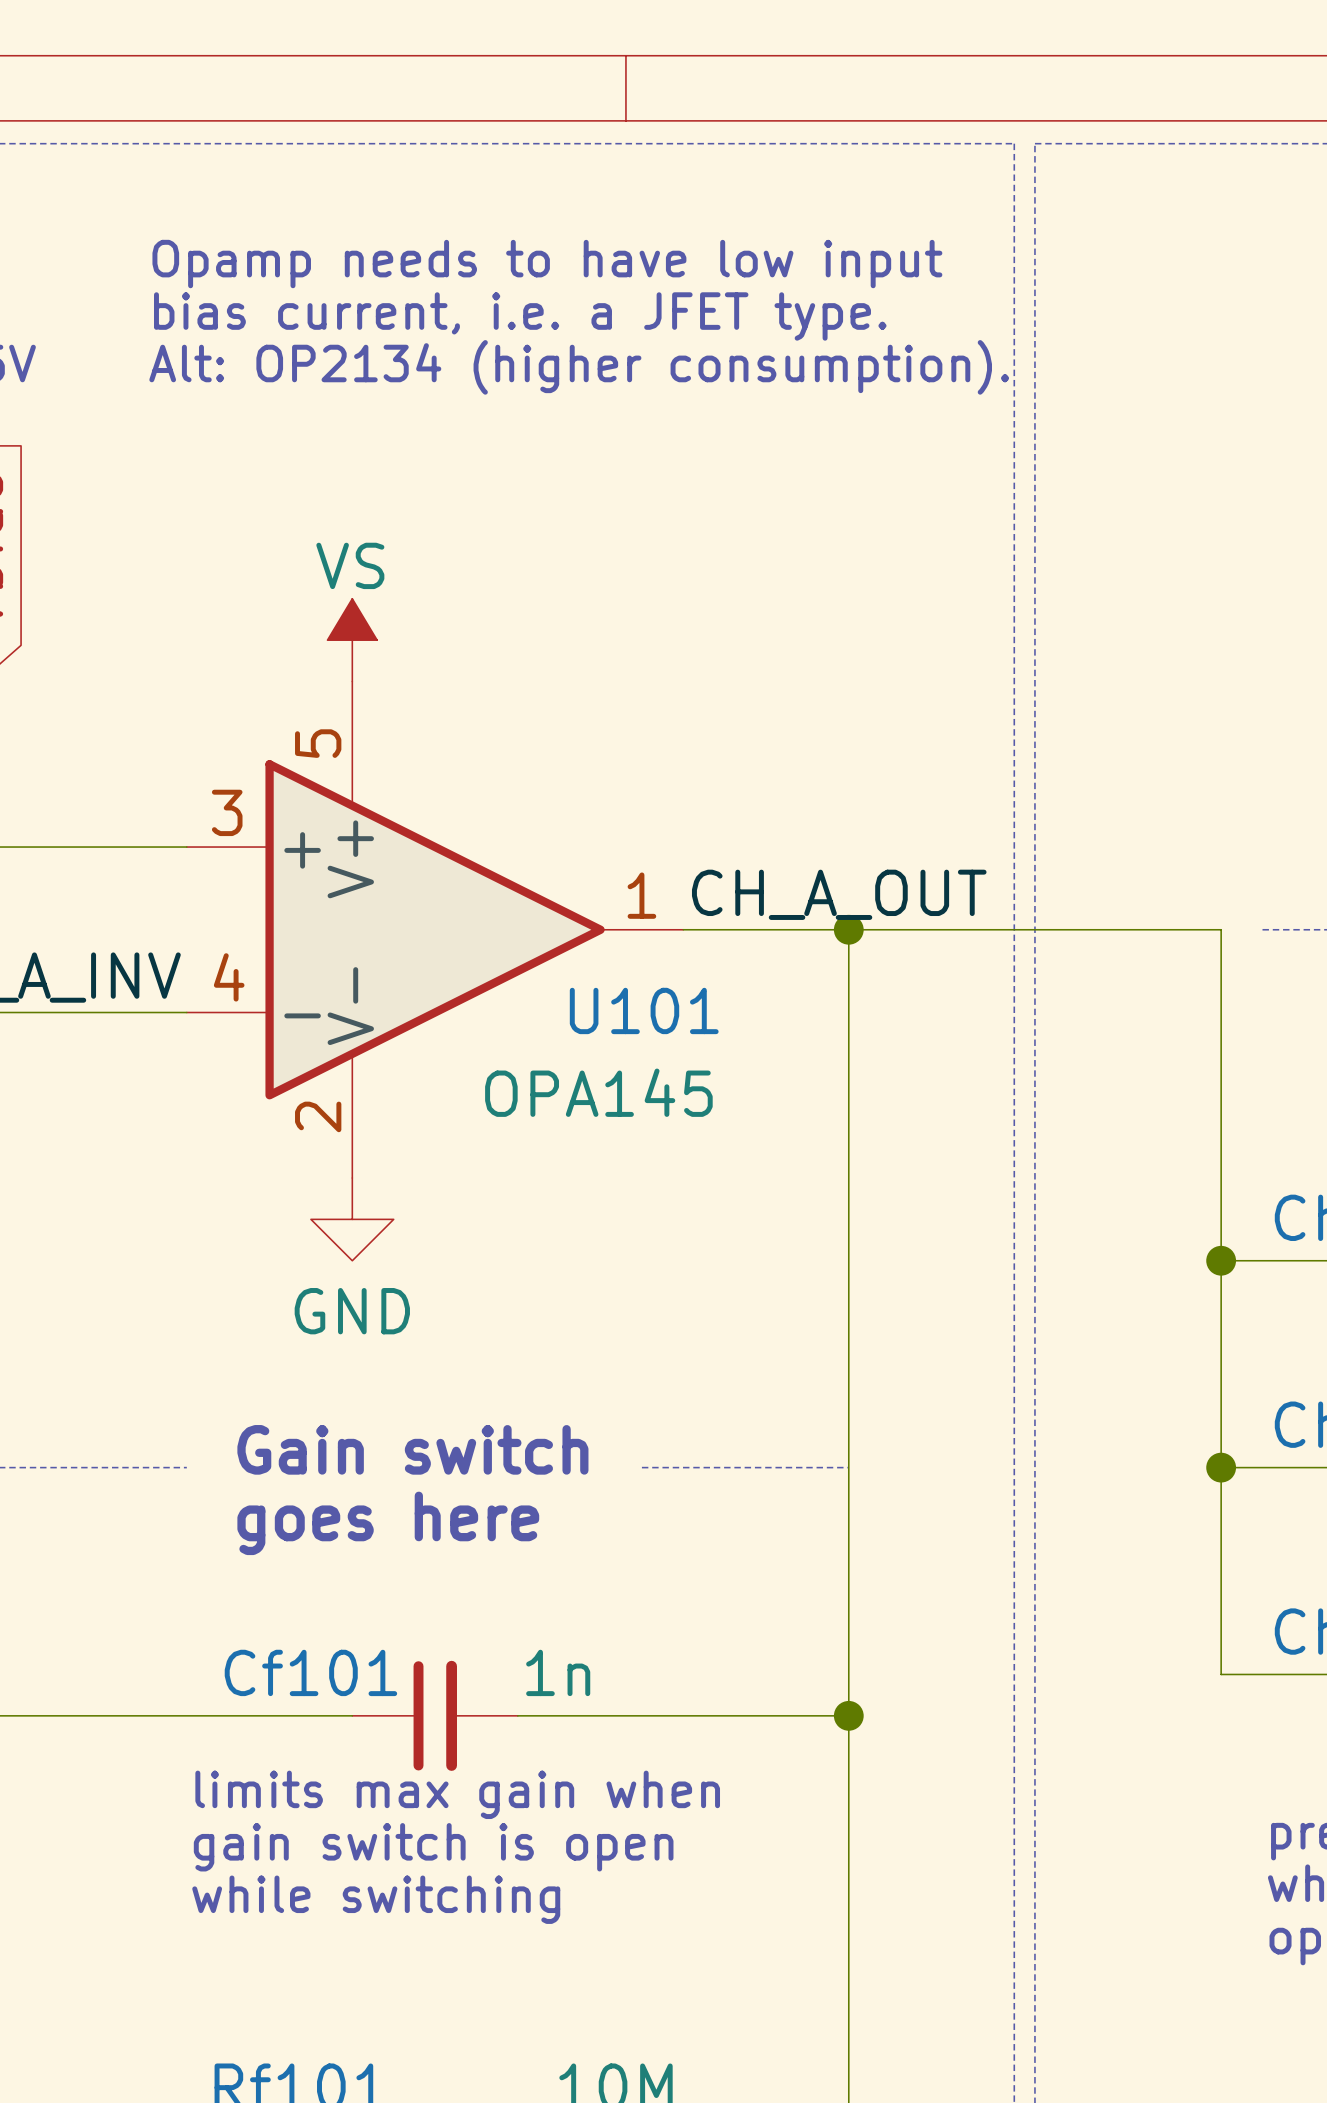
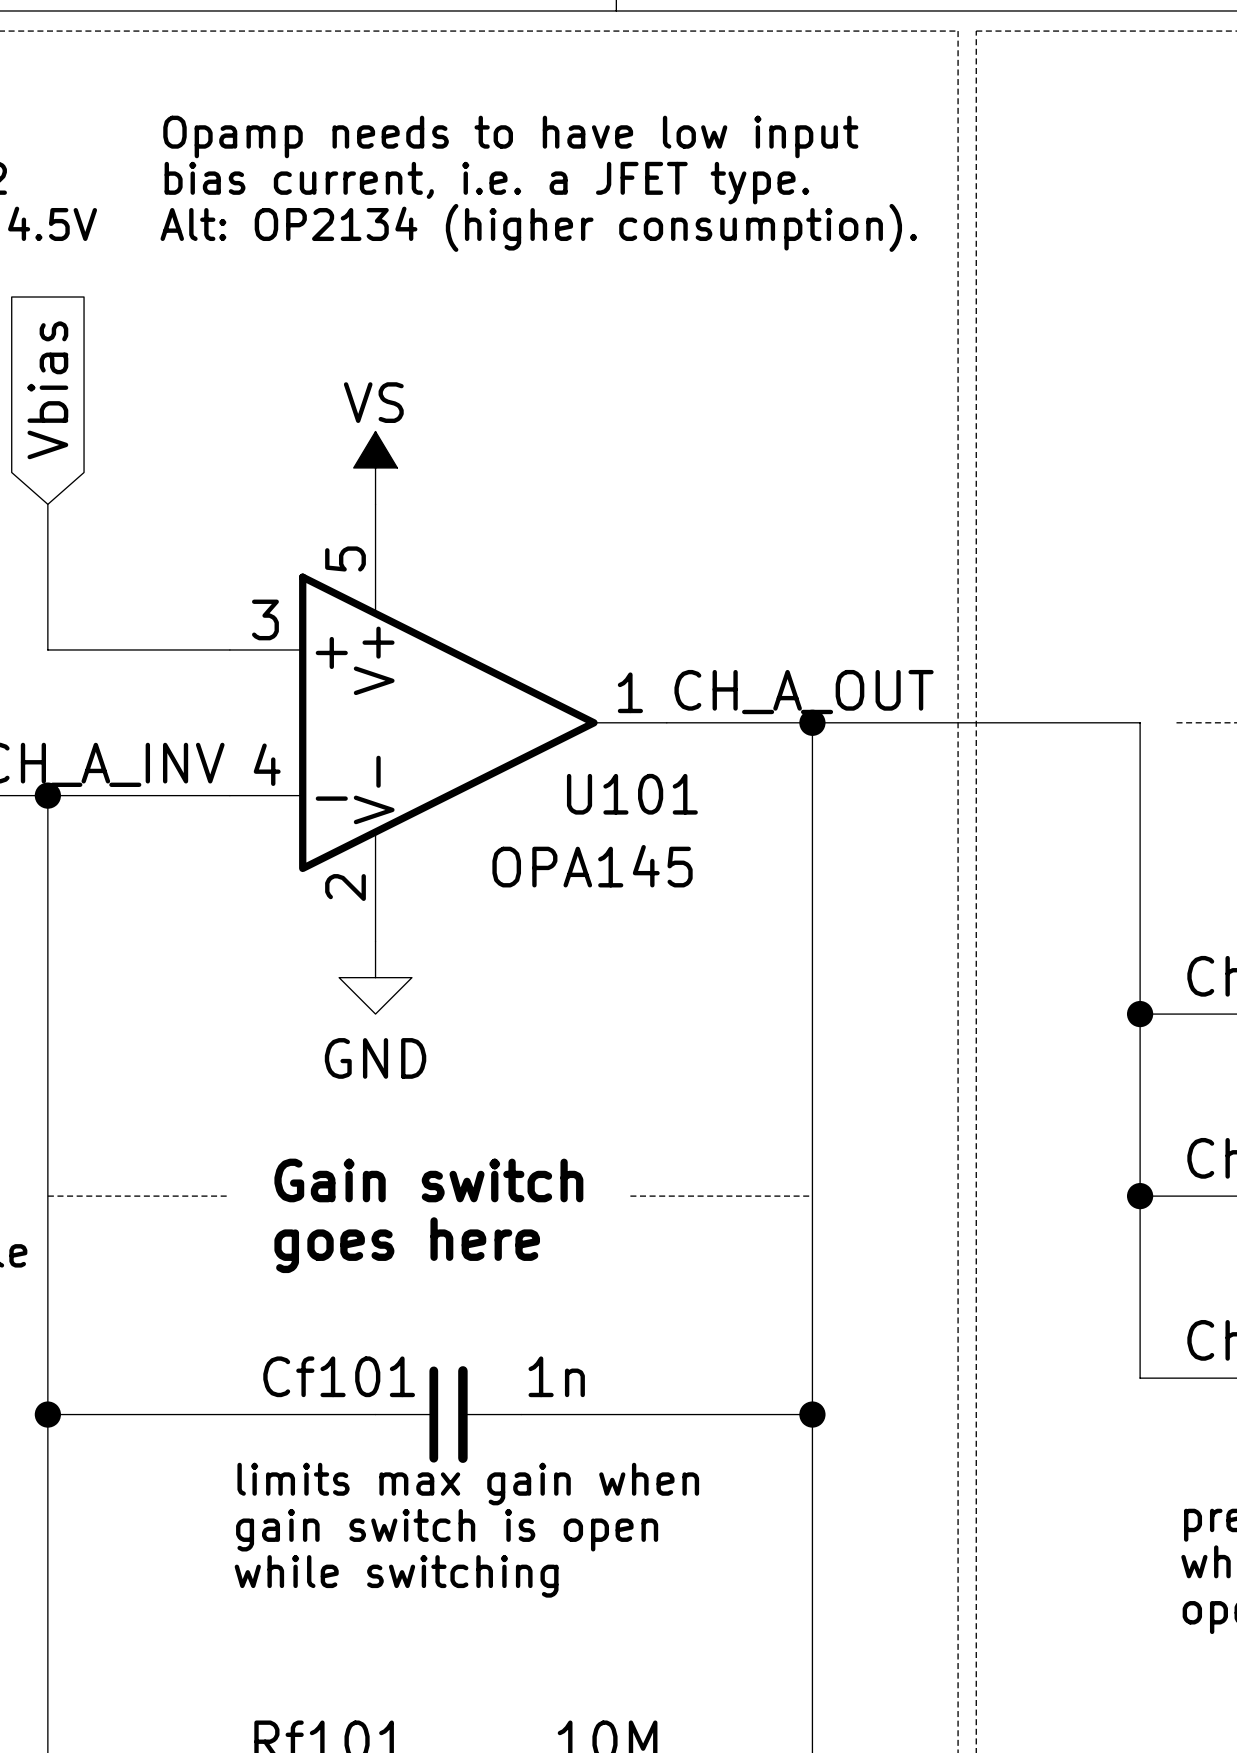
text position: Opamp needs to have low input (547, 264) -> Opamp needs to have low input (510, 136)
text position: bias current, i.e. a JFET type. (520, 316) -> bias current, i.e. a JFET type. (486, 183)
text position: Alt: OP2134 (higher consumption). (579, 367) -> Alt: OP2134 (higher consumption). (538, 227)

